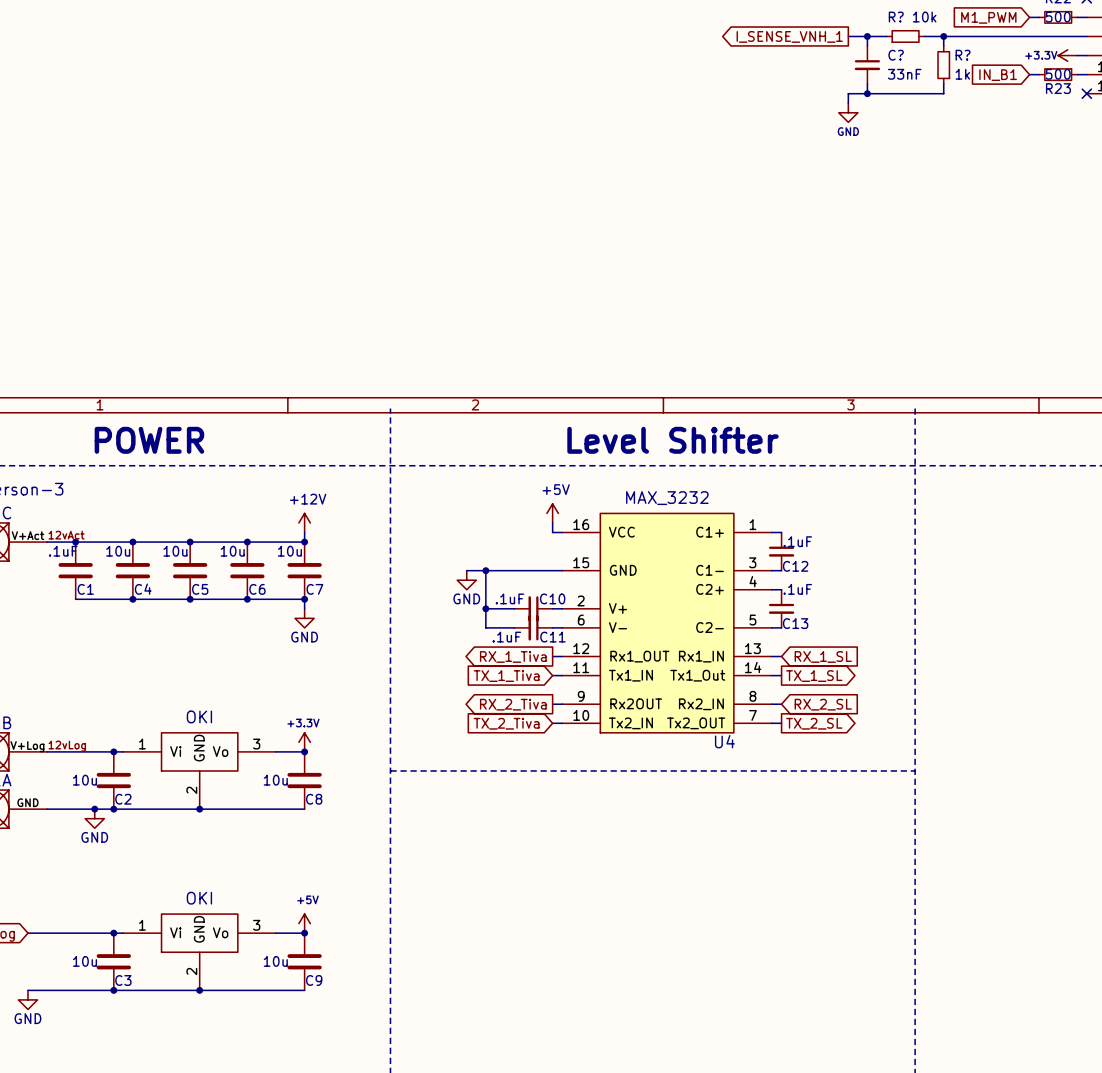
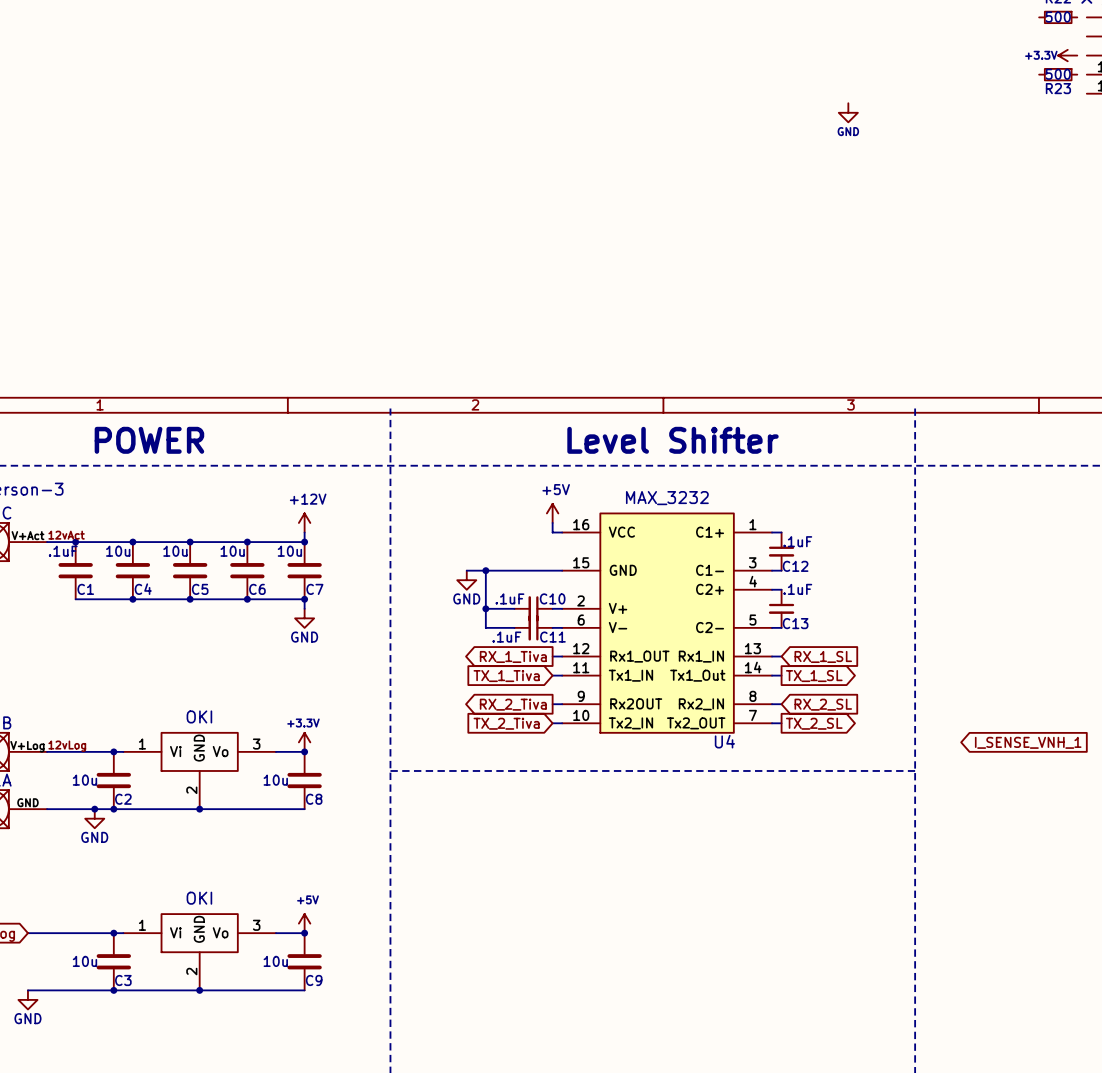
global label: M1_PWM (988, 17) -> none
wire: (1029, 17) (1039, 17) -> none
wire: (1077, 17) (1086, 17) -> none
global label: I_SENSE_VNH_1 (789, 36) -> none
wire: (848, 36) (886, 36) -> none
wire: (867, 36) (867, 46) -> none
junction: (867, 36) -> none
R?: 10k (905, 36) -> none
wire: (924, 36) (1086, 36) -> none
wire: (943, 36) (943, 46) -> none
junction: (943, 36) -> none
wire: (1077, 55) (1086, 55) -> none
C?: 33nF (867, 65) -> none
R?: 1k (943, 65) -> none
wire: (1029, 74) (1039, 74) -> none
wire: (1077, 74) (1086, 74) -> none
global label: IN_B1 (998, 75) -> none
wire: (867, 84) (867, 93) -> none
wire: (943, 84) (943, 93) (848, 93) (848, 103) -> none
junction: (867, 93) -> none
no-connect mark: (1086, 93) -> none
global label: none -> I_SENSE_VNH_1 (1028, 742)

